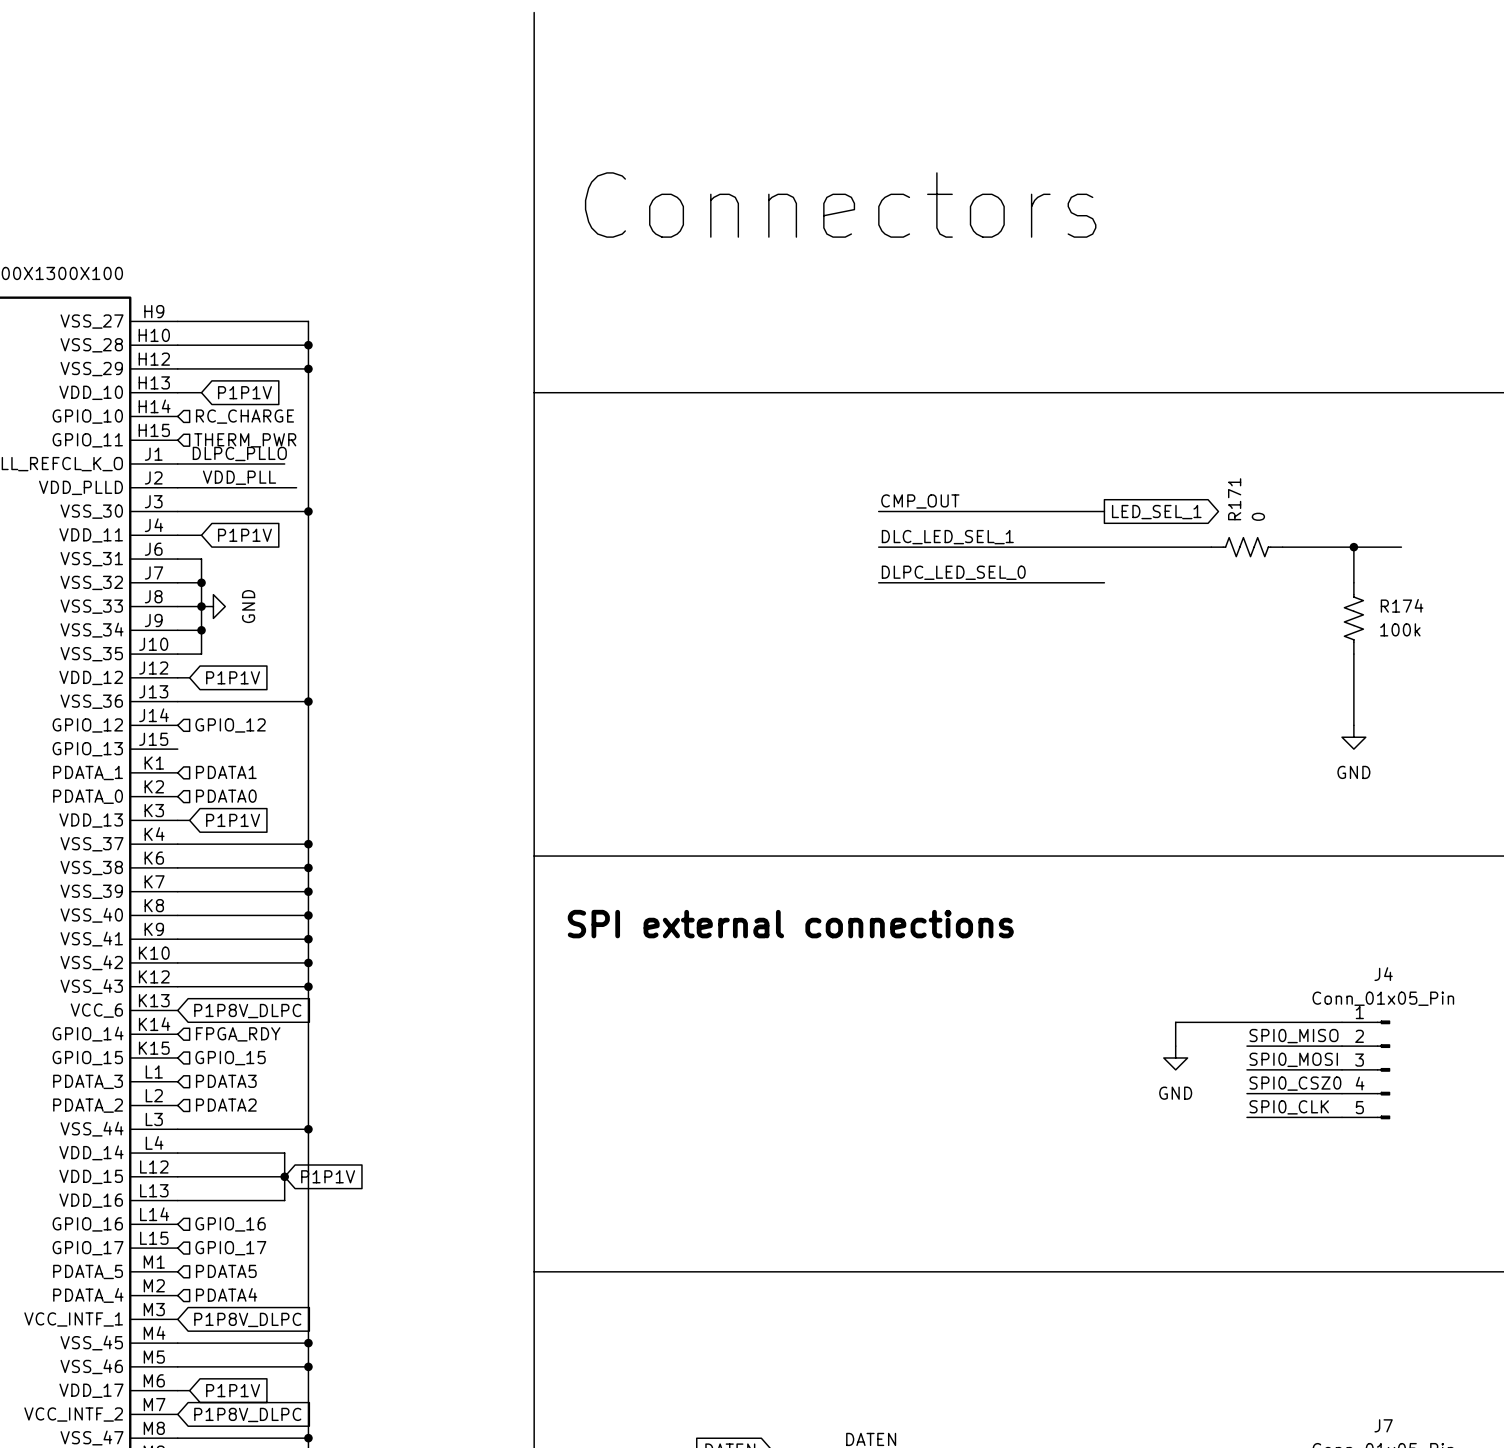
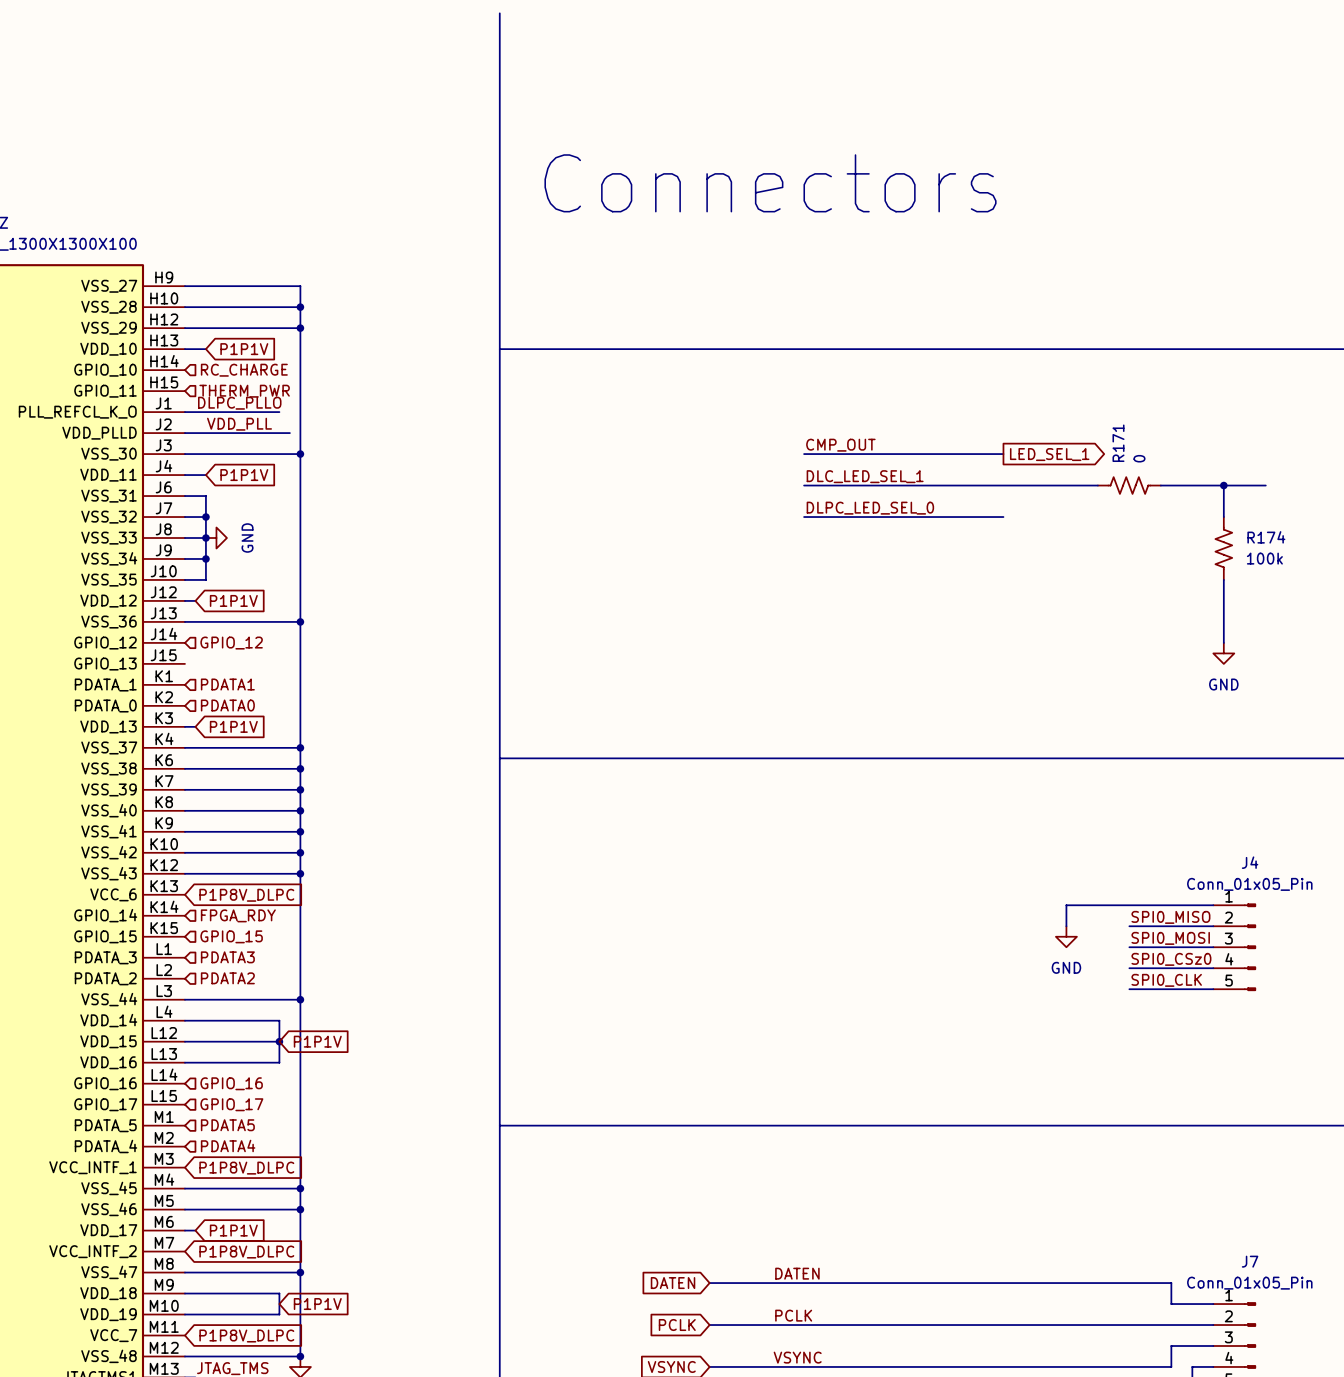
text: SPI external connections (790, 924) -> none
label: SPI0_CSZ0 (1295, 1083) -> SPI0_CSz0 (1171, 959)

